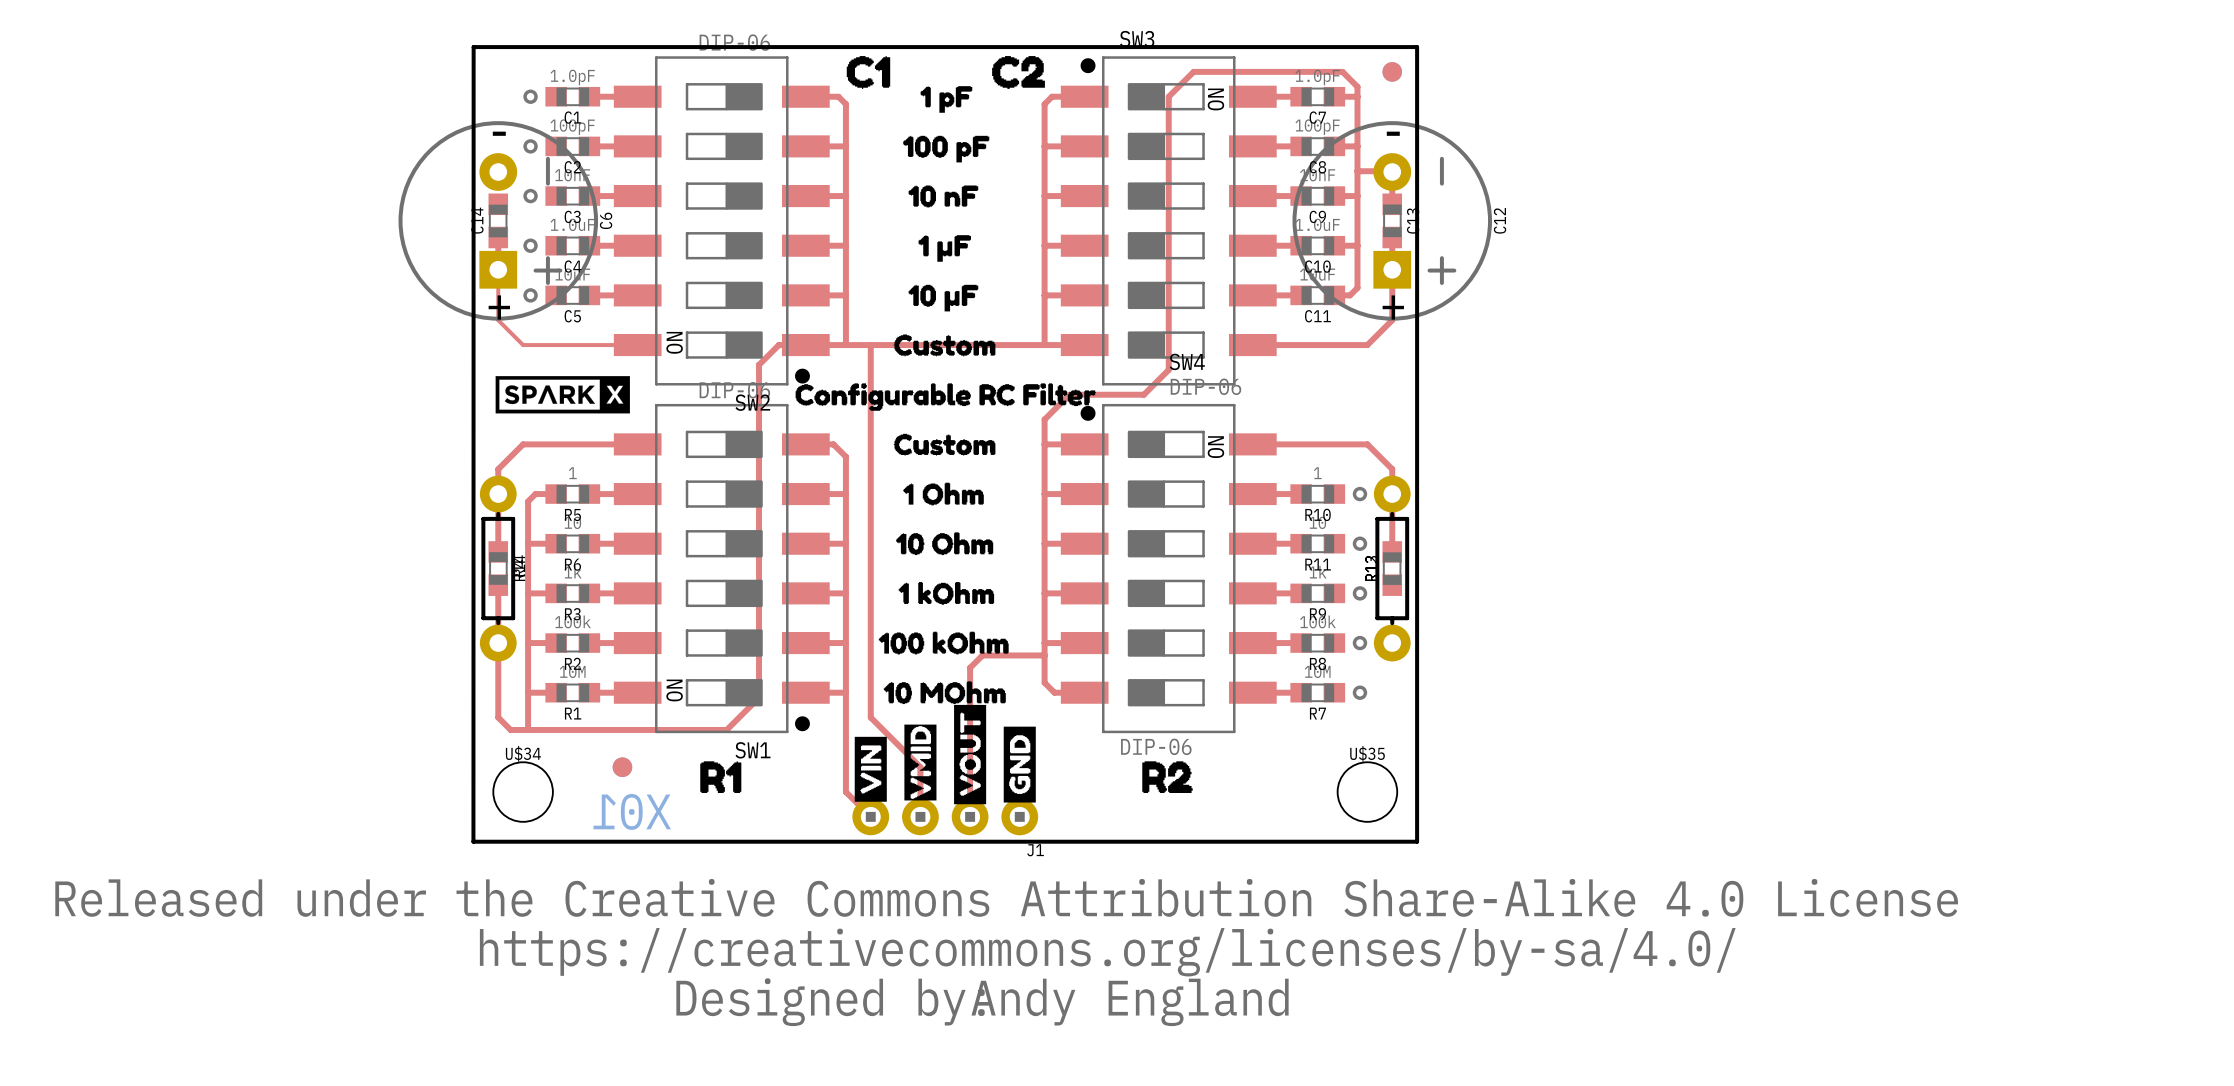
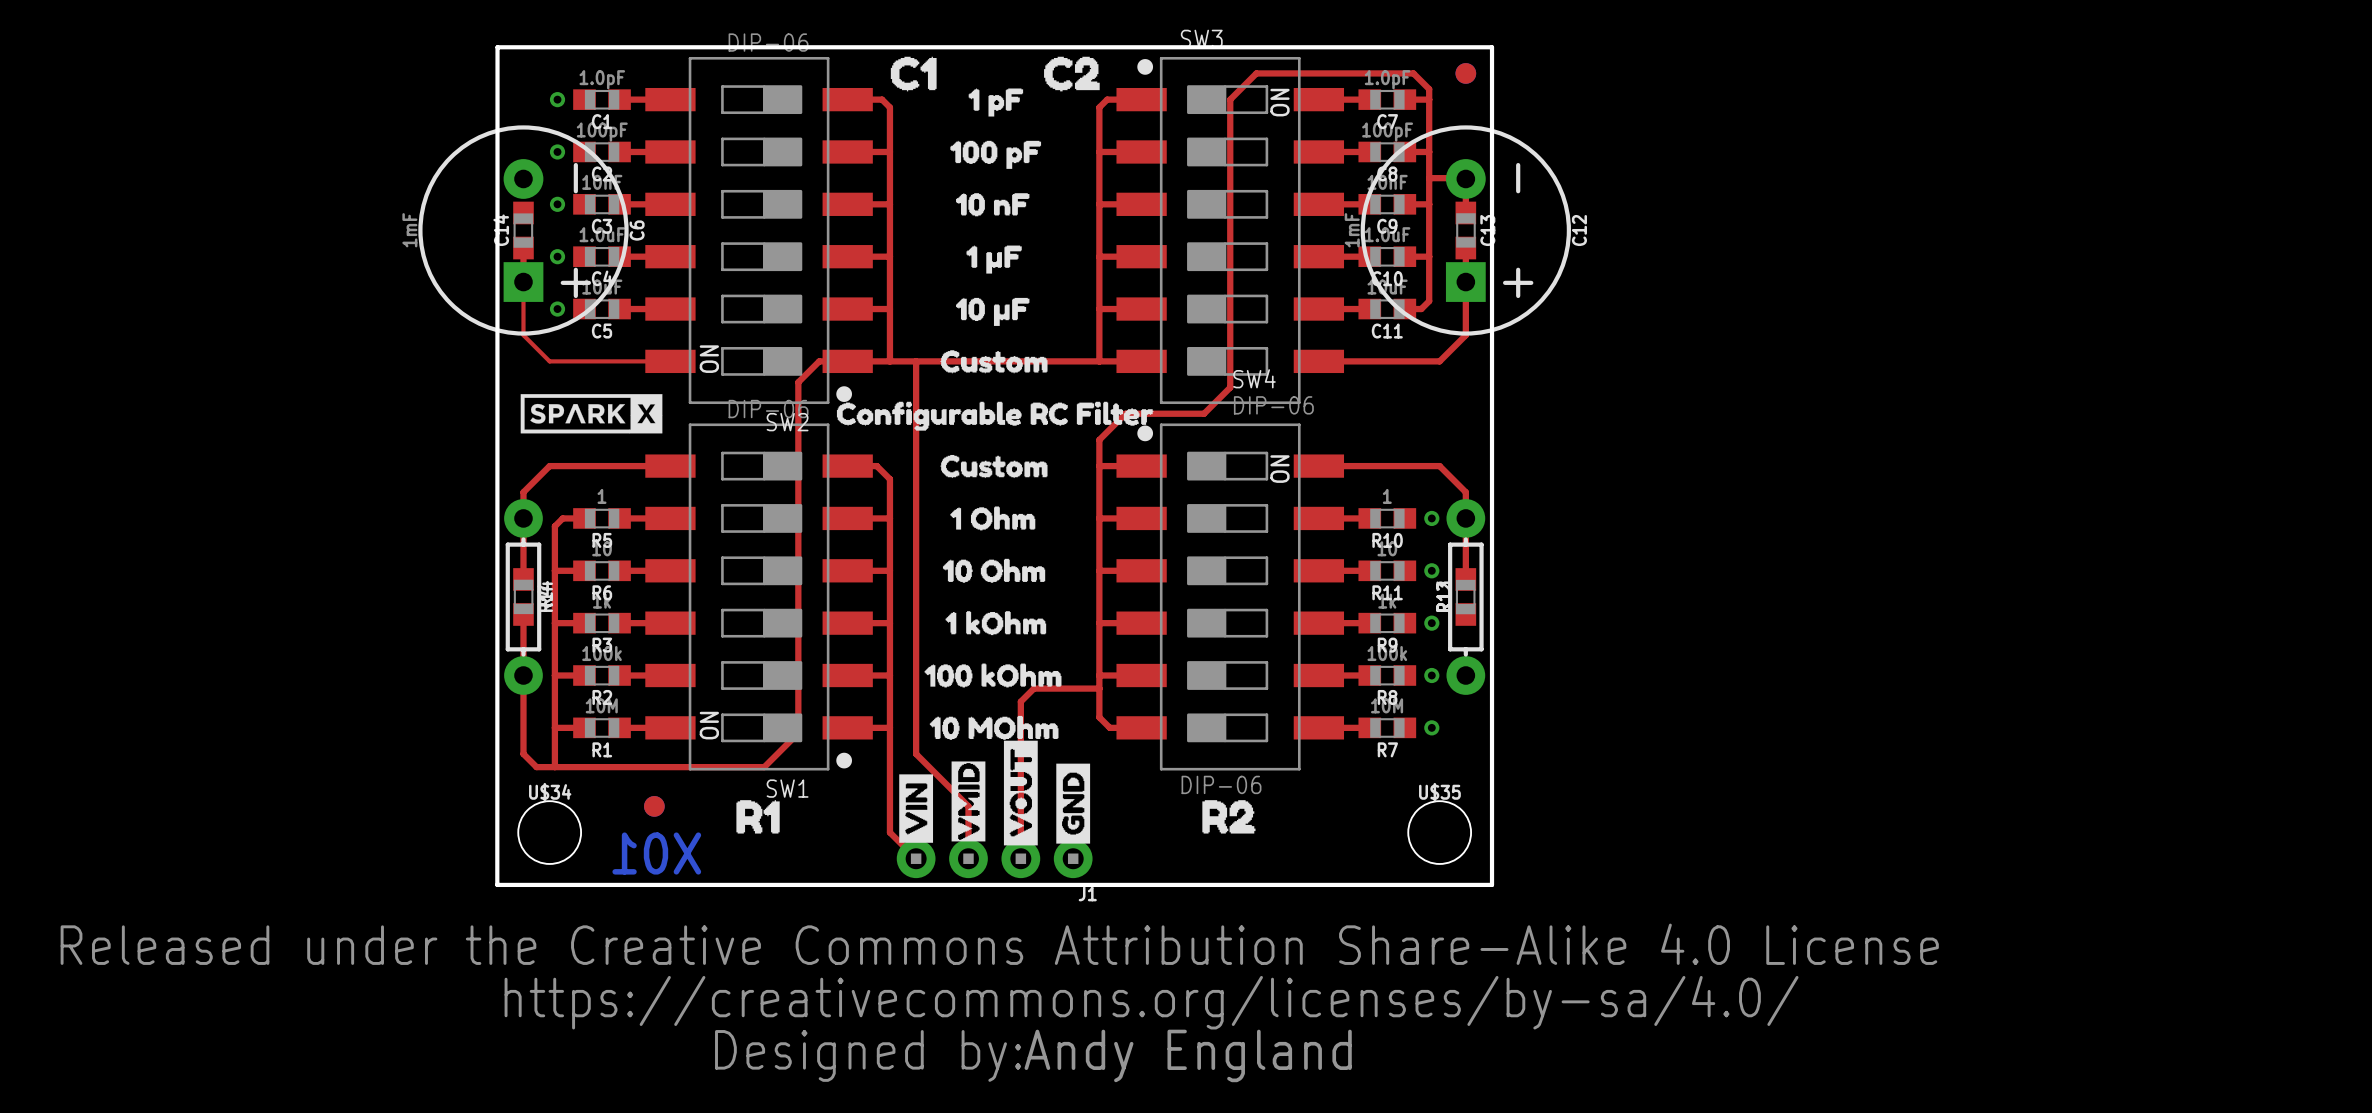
C6 footprint: [398, 121, 599, 321] -> [418, 125, 629, 336]
C12 footprint: [1292, 121, 1493, 321] -> [1360, 125, 1571, 336]
text: - (499, 133) -> none
text: - (1393, 133) -> none
C6 value: none -> 1mF (409, 230)
C12 value: none -> 1mF (1352, 230)
text: + (499, 307) -> none
text: + (1393, 307) -> none

